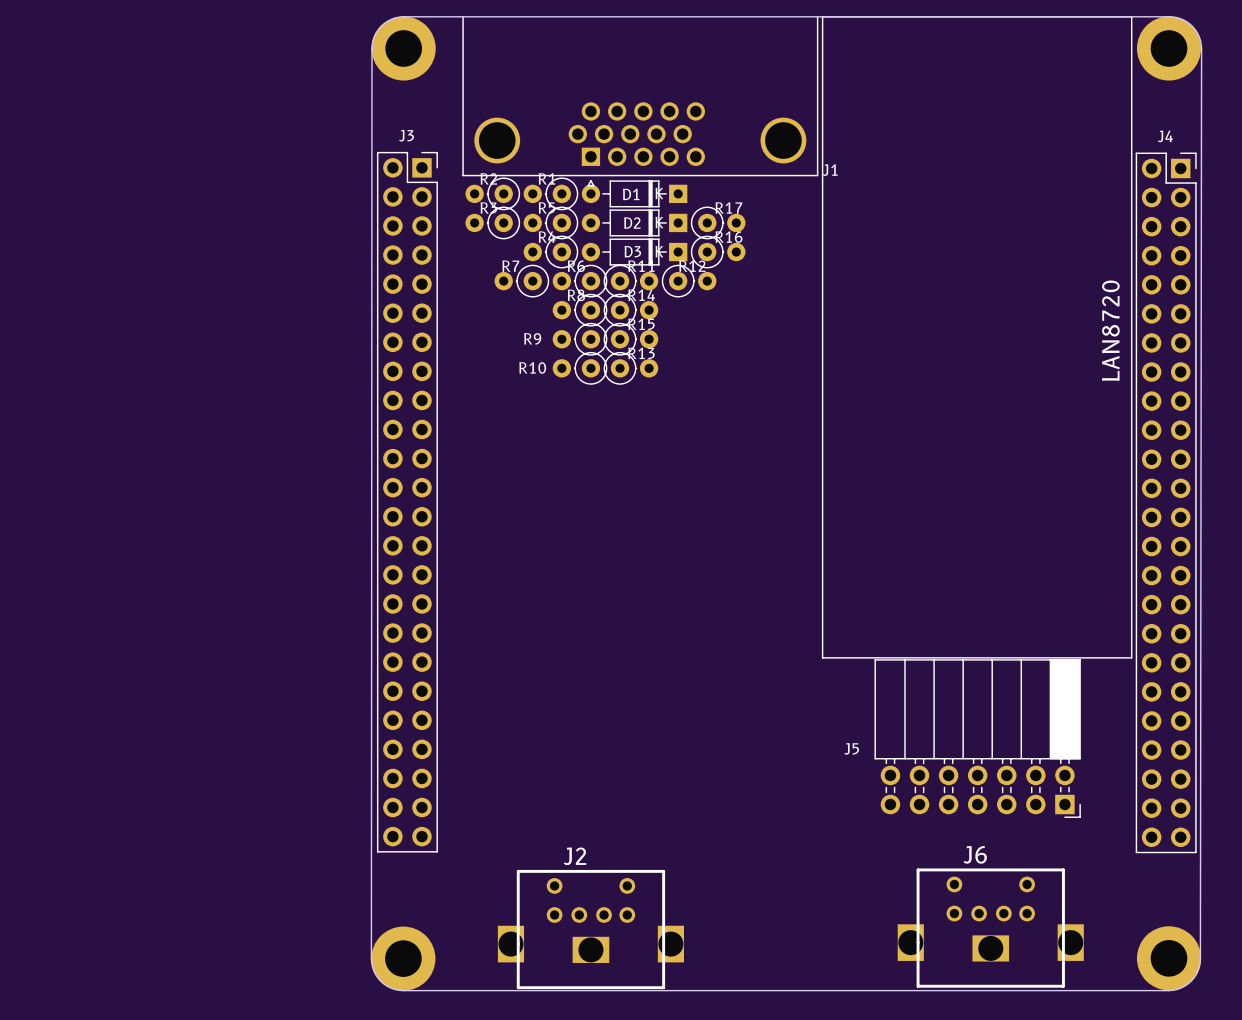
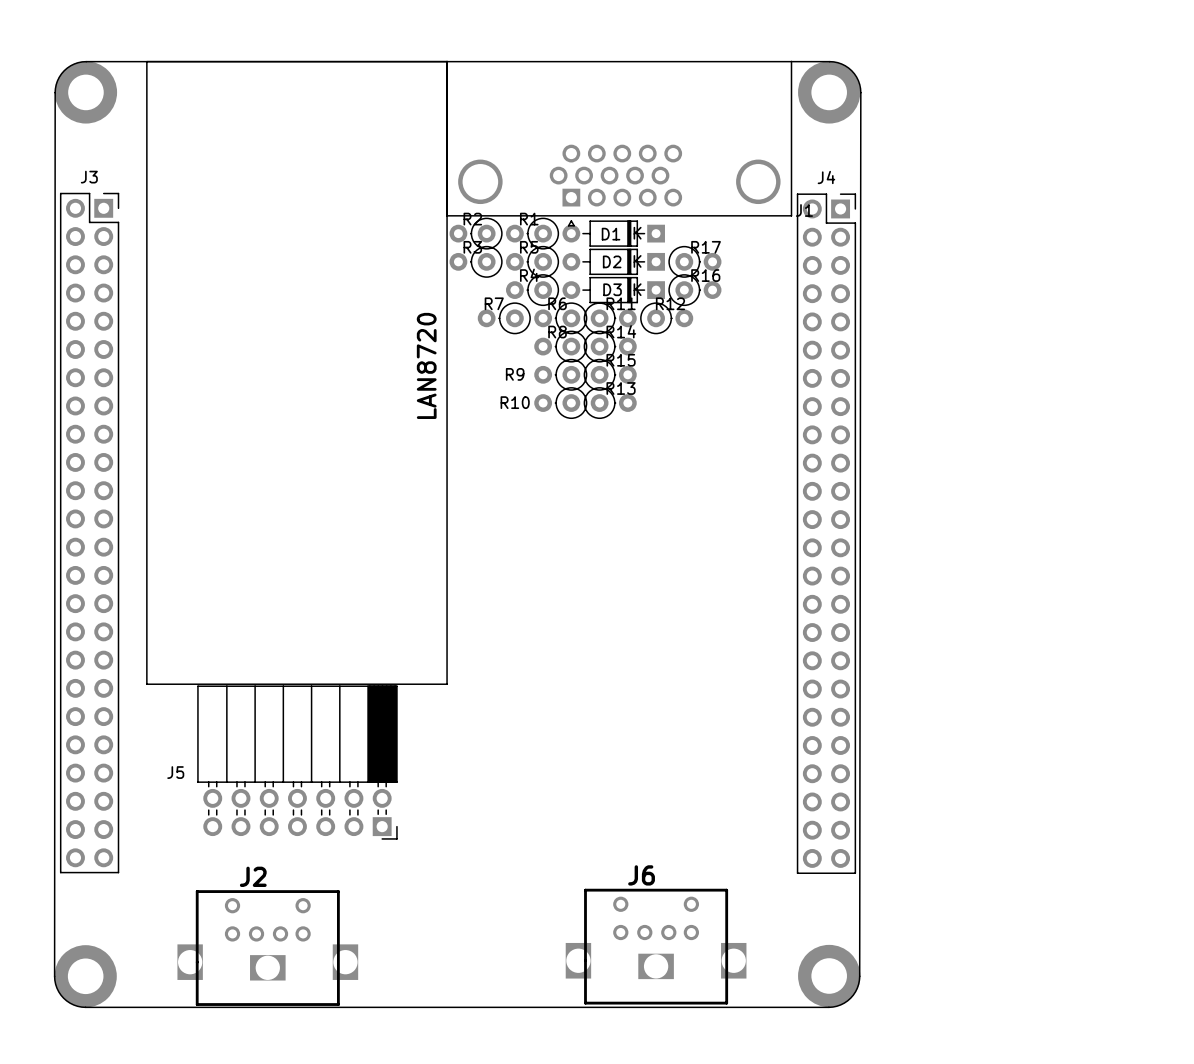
line: none -> (146, 61) (146, 684) (447, 684) (447, 61) (146, 61)
board edge: (403, 16) (391, 19) (381, 26) (374, 36) (371, 48) (371, 958) (373, 970) (380, 981) (391, 988) (403, 990) -> (389, 61) (86, 61) (70, 65) (64, 70) (57, 80) (55, 92) (54, 976) (56, 988) (63, 998) (70, 1003) (81, 1007) (389, 1007)
line: (822, 16) (822, 657) (1131, 657) (1131, 16) (822, 16) -> none
board edge: (857, 16) (1173, 17) (1185, 21) (1192, 26) (1199, 36) (1201, 48) (1200, 958) (1198, 970) (1188, 983) (1176, 989) (1168, 990) (856, 990) -> (829, 61) (841, 64) (851, 70) (858, 80) (860, 92) (859, 976) (857, 988) (850, 998) (840, 1004) (828, 1007)
part: none -> (85, 92)
part: (403, 48) -> none
part: none -> (829, 92)
part: (1169, 48) -> none
text: none -> LAN8720 (426, 365)
text: LAN8720 (1110, 330) -> none
J3 position: (407, 502) -> (89, 533)
J4 position: (1166, 502) -> (826, 533)
J5 position: (977, 738) -> (297, 762)
J6 position: (990, 928) -> (656, 946)
J2 position: (590, 929) -> (267, 948)
part: none -> (85, 976)
part: (403, 958) -> none
part: none -> (829, 976)
part: (1169, 958) -> none

